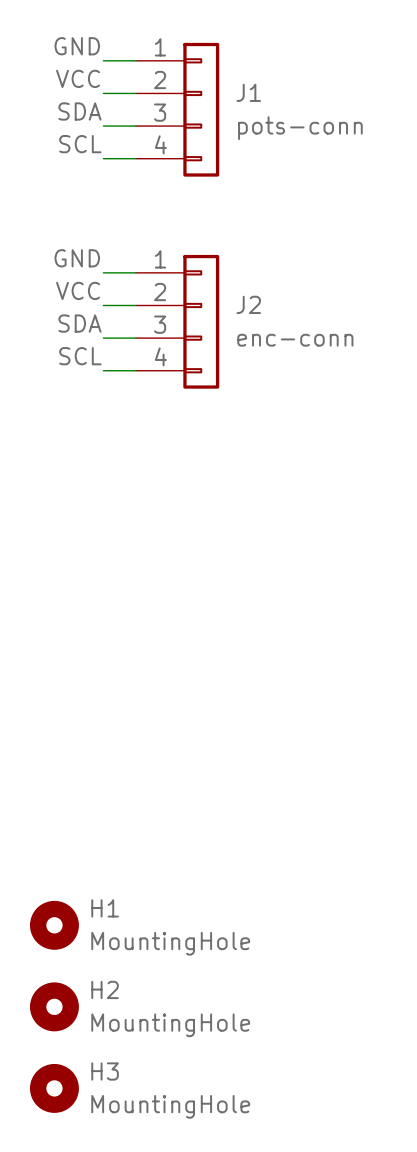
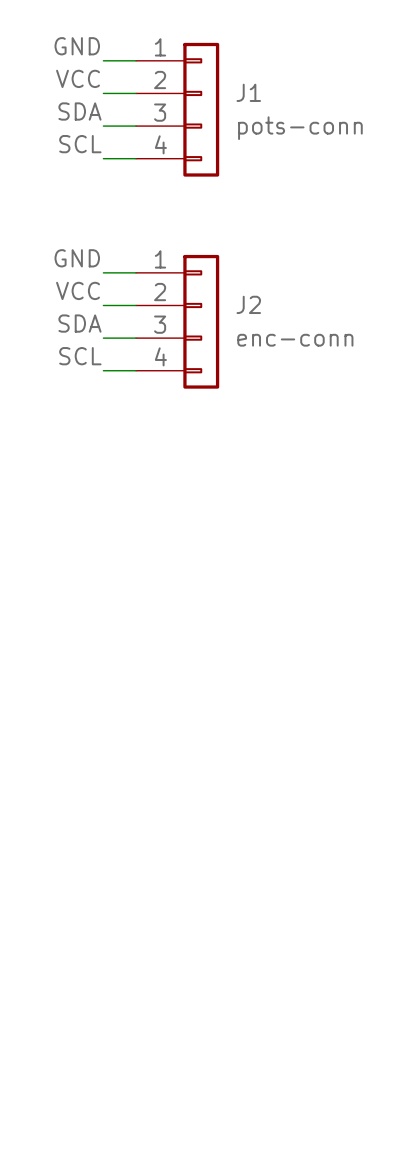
H1: MountingHole (54, 925) -> none
H2: MountingHole (54, 1006) -> none
H3: MountingHole (54, 1088) -> none

